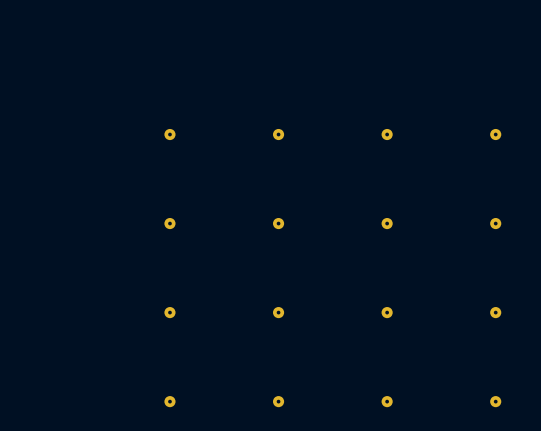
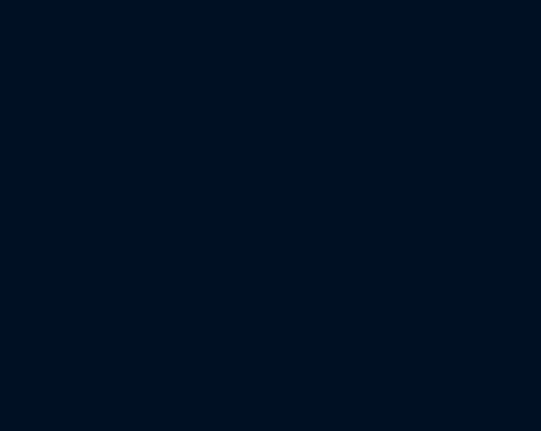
part: (169, 134) -> none
part: (278, 134) -> none
part: (387, 134) -> none
part: (495, 134) -> none
part: (169, 223) -> none
part: (278, 223) -> none
part: (387, 223) -> none
part: (495, 223) -> none
part: (169, 312) -> none
part: (278, 312) -> none
part: (387, 312) -> none
part: (495, 312) -> none
part: (169, 401) -> none
part: (278, 401) -> none
part: (387, 401) -> none
part: (495, 401) -> none

